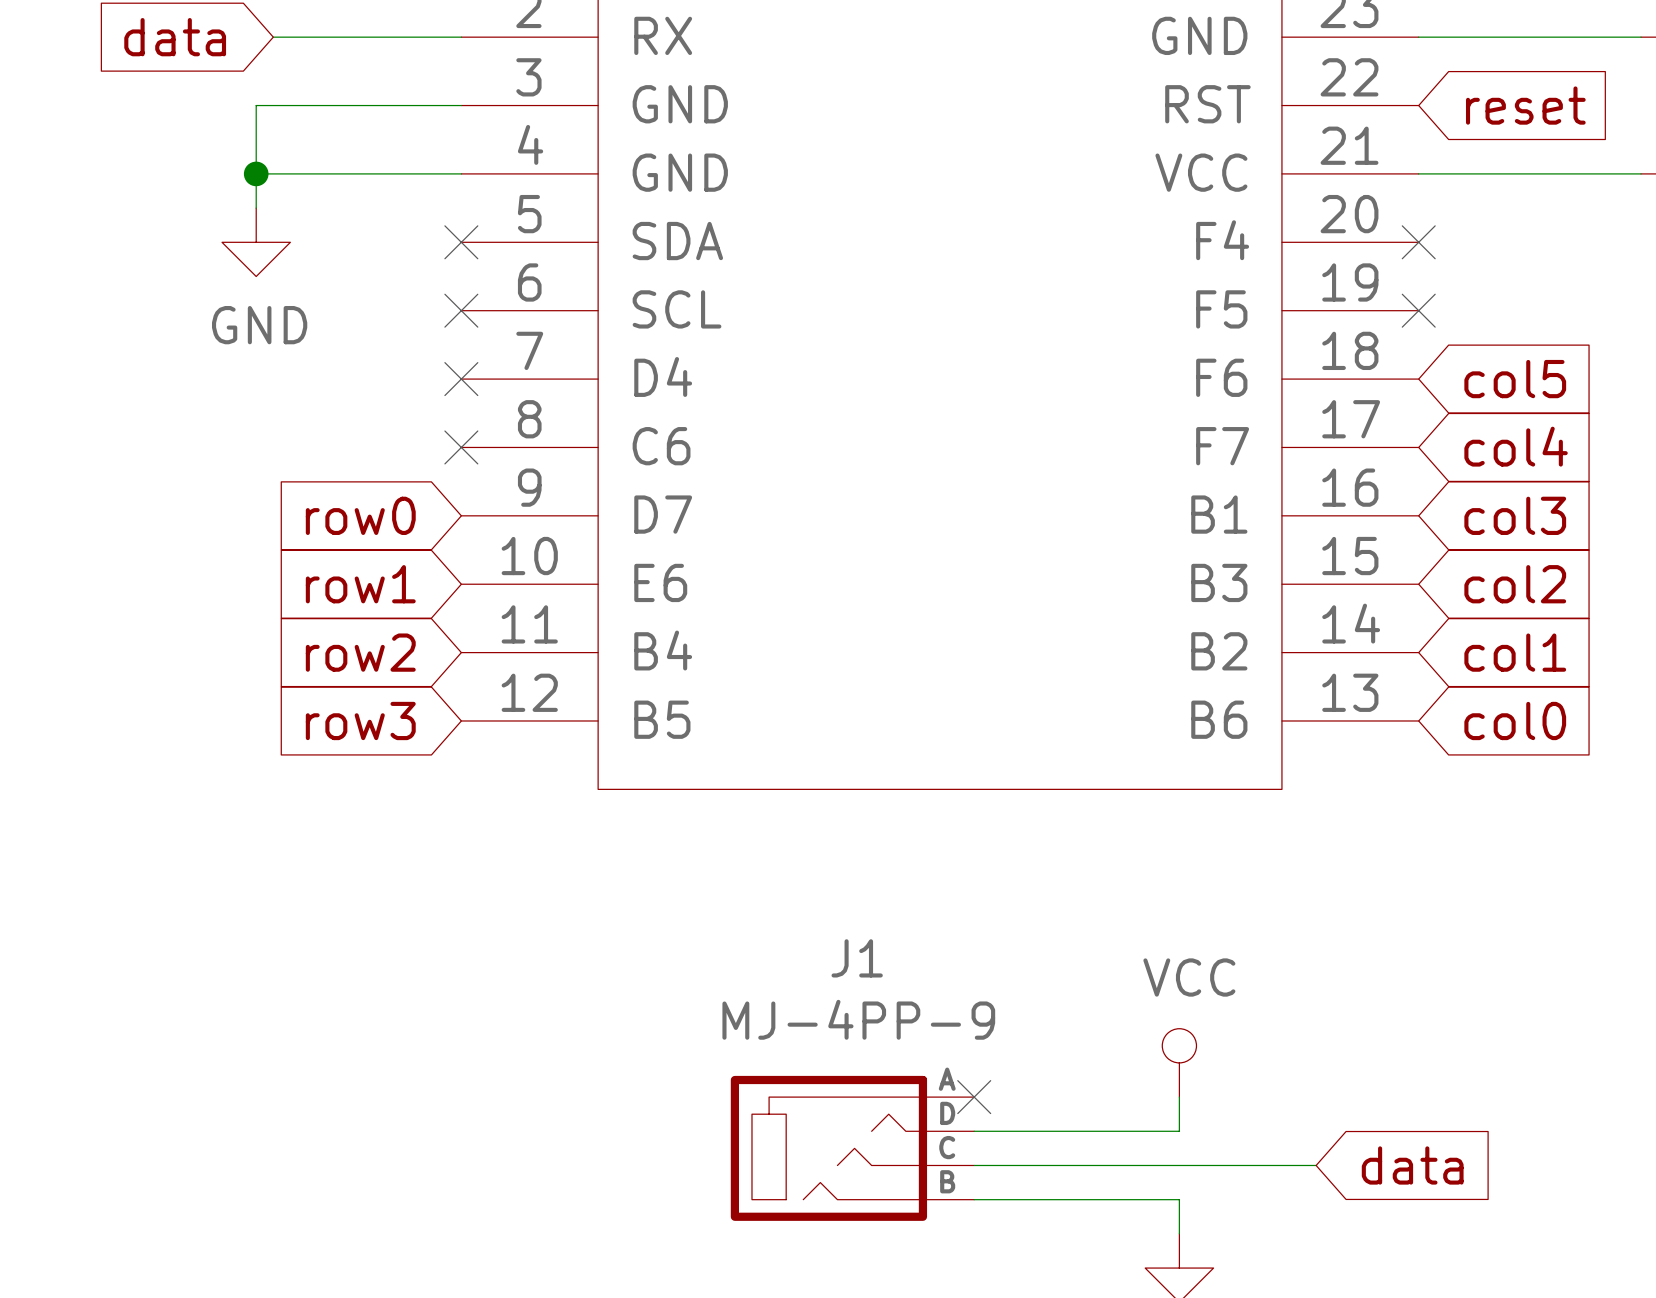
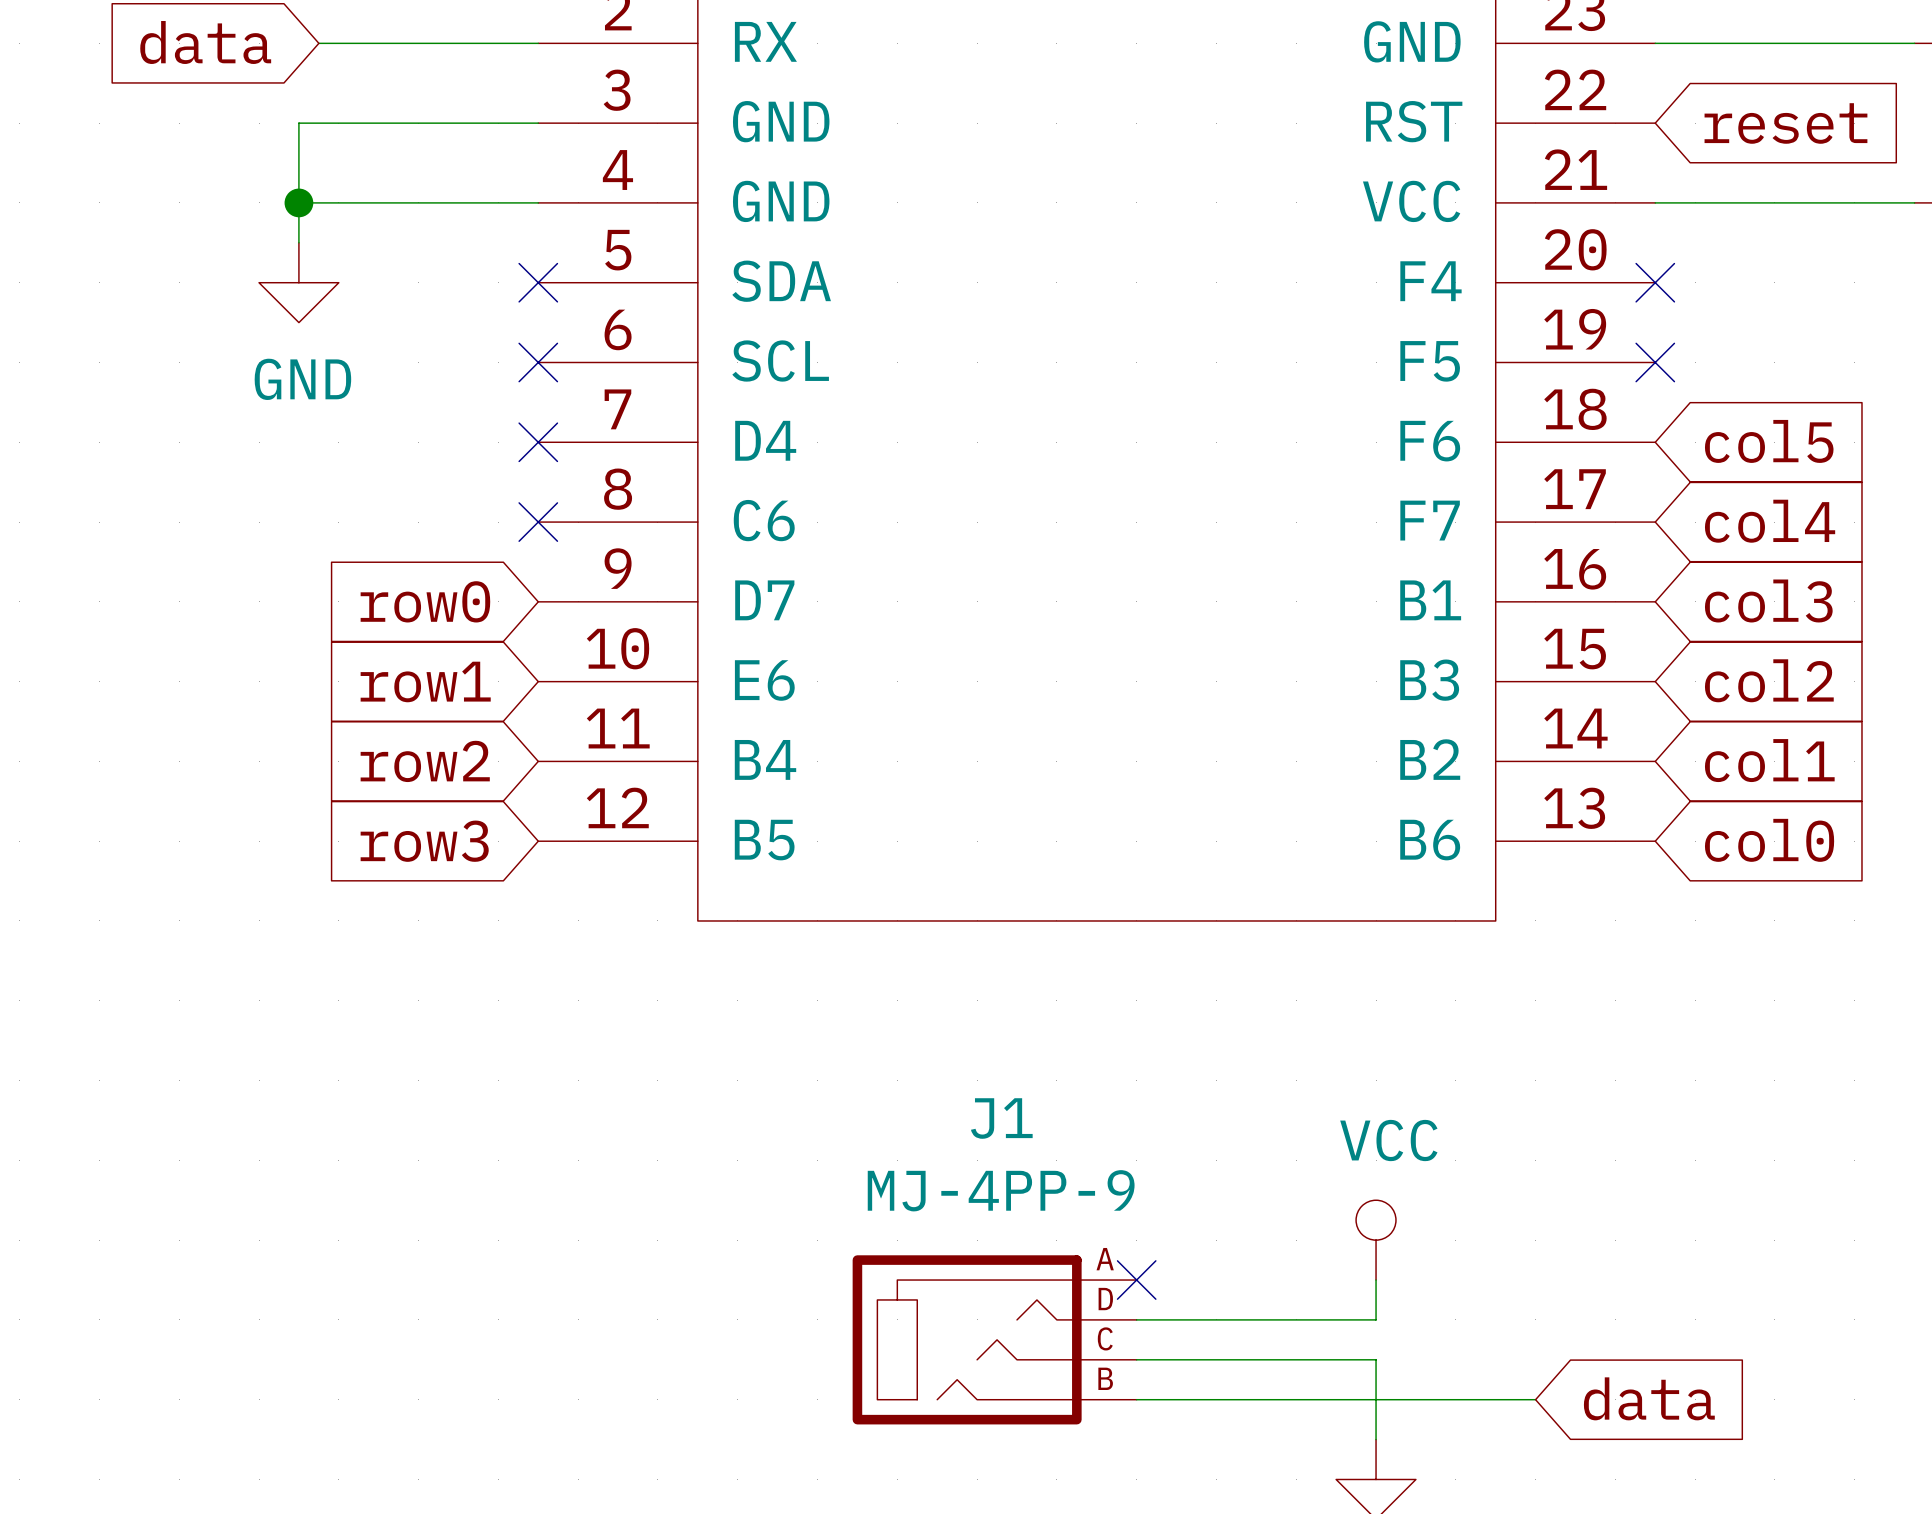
wire: (1179, 1165) (1316, 1165) -> (1376, 1359) (1376, 1399) (1535, 1399)
global label position: data (1412, 1165) -> data (1649, 1398)

